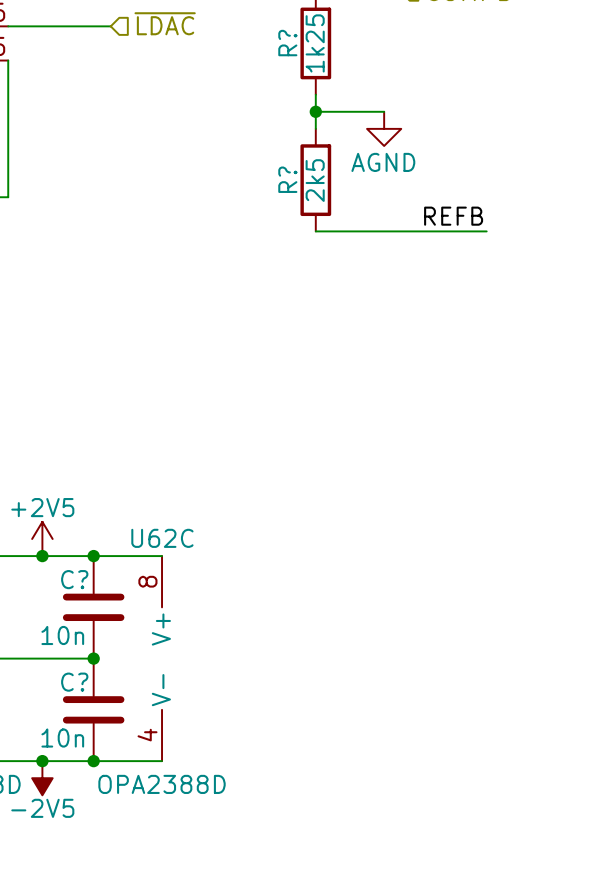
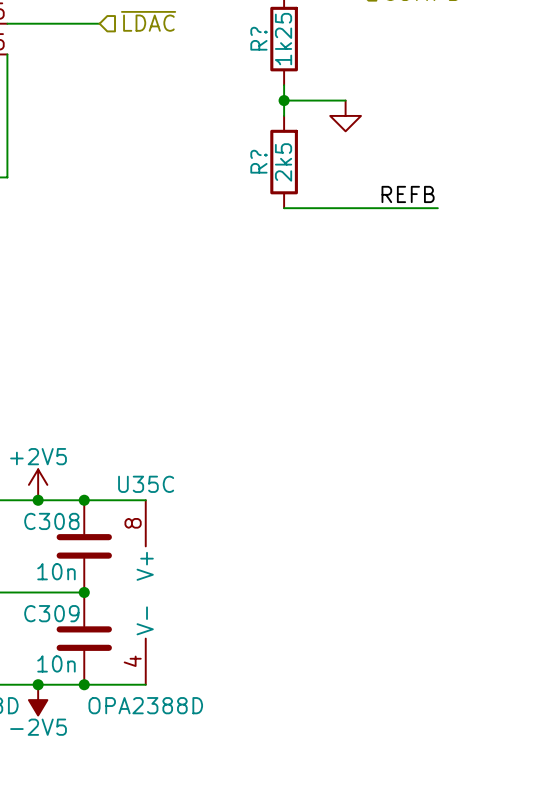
power symbol text: AGND (383, 162) -> none
U62C name: U62C (162, 538) -> U35C (146, 484)
C? name: C? (74, 579) -> C308 (51, 521)
C? name: C? (74, 682) -> C309 (51, 613)

